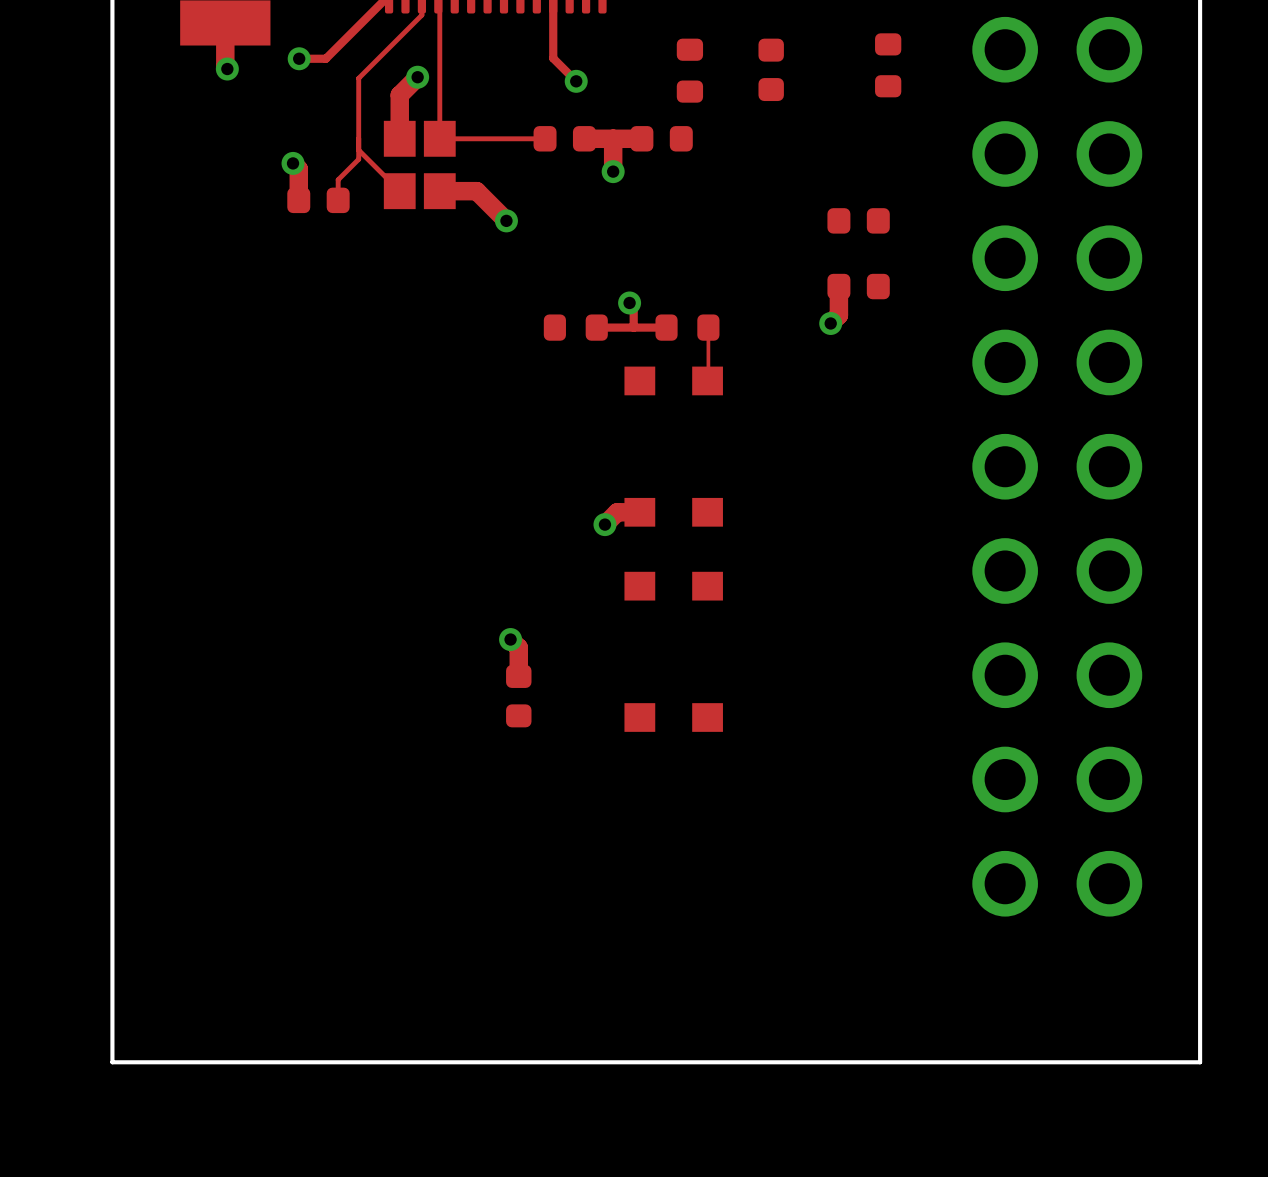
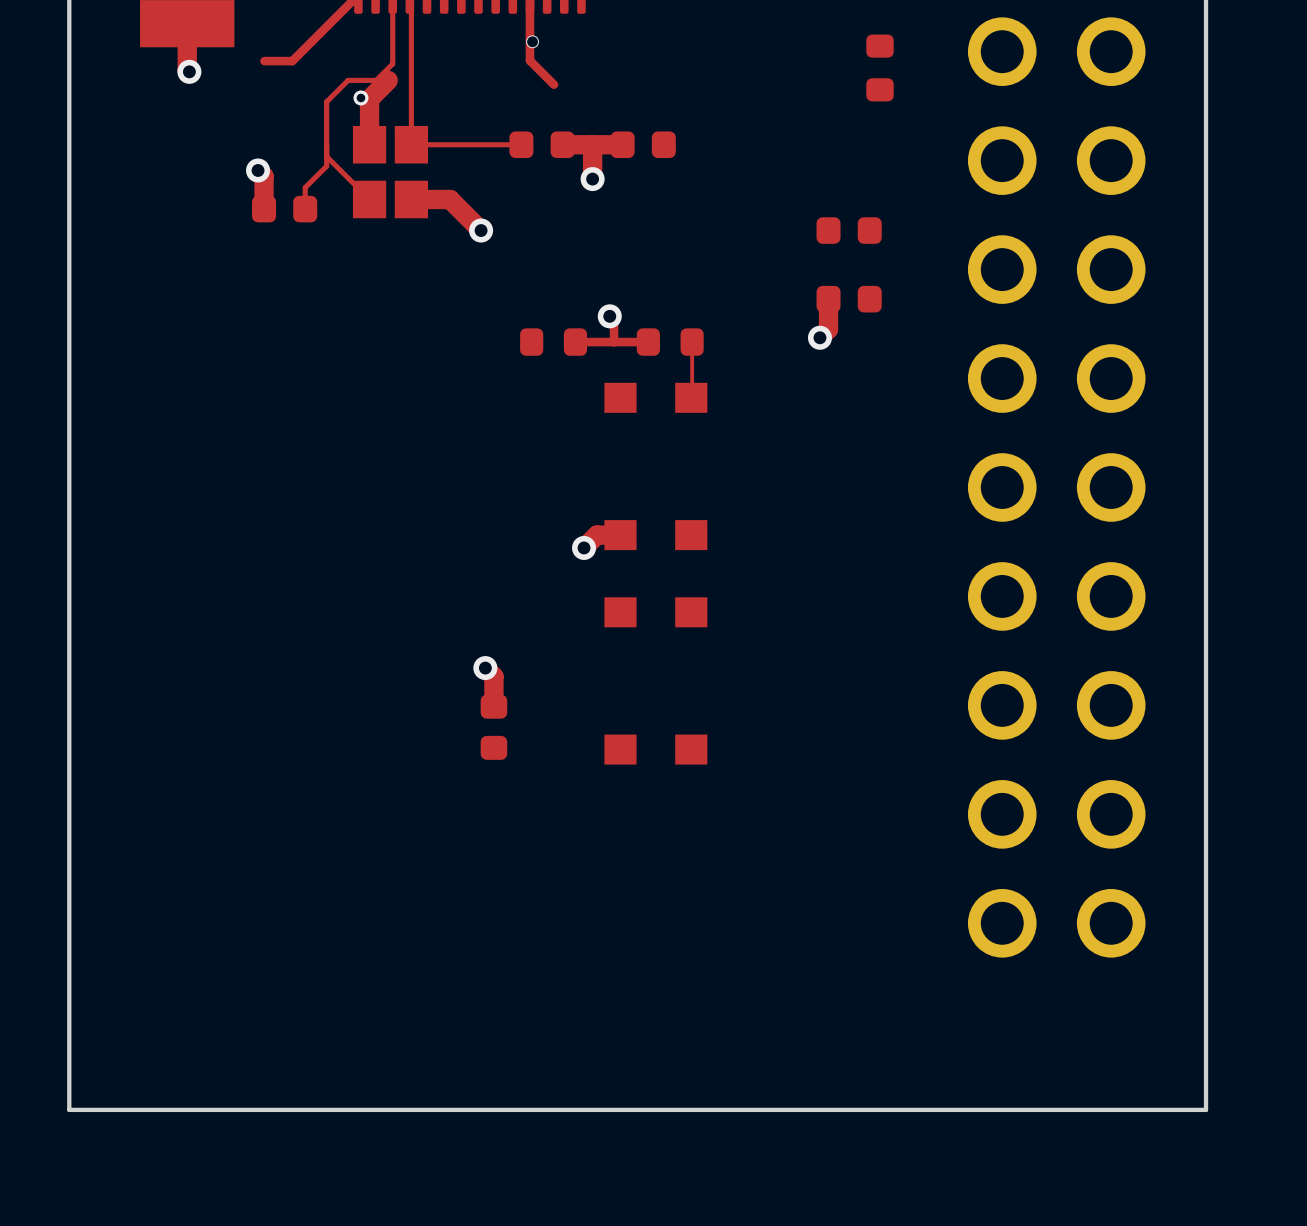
top track: (421, 15) (358, 78) (358, 97) -> (392, 15) (392, 63) (376, 80) (348, 80) (326, 101)
via: none -> (532, 41)
via: (299, 58) -> none
part: (771, 69) -> none
part: (689, 70) -> none
via: (417, 77) -> none
via: (576, 81) -> none
via: none -> (360, 97)

